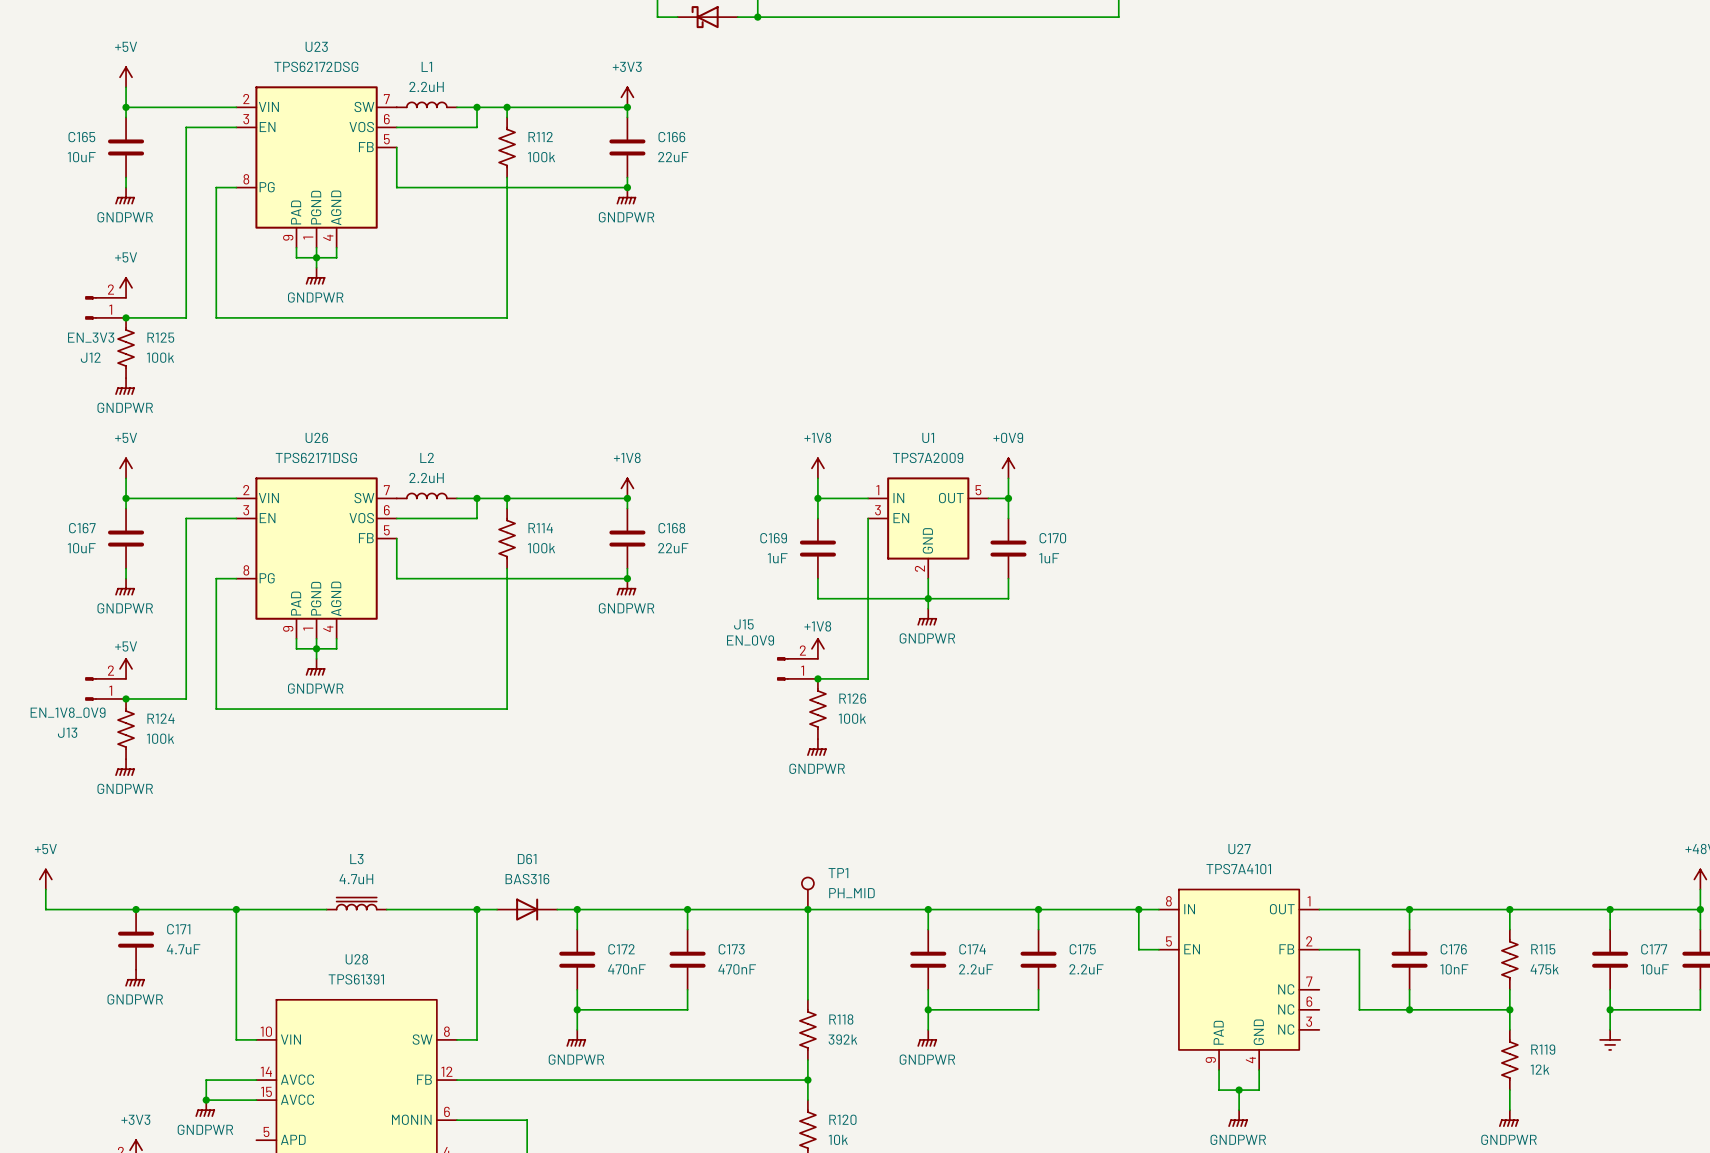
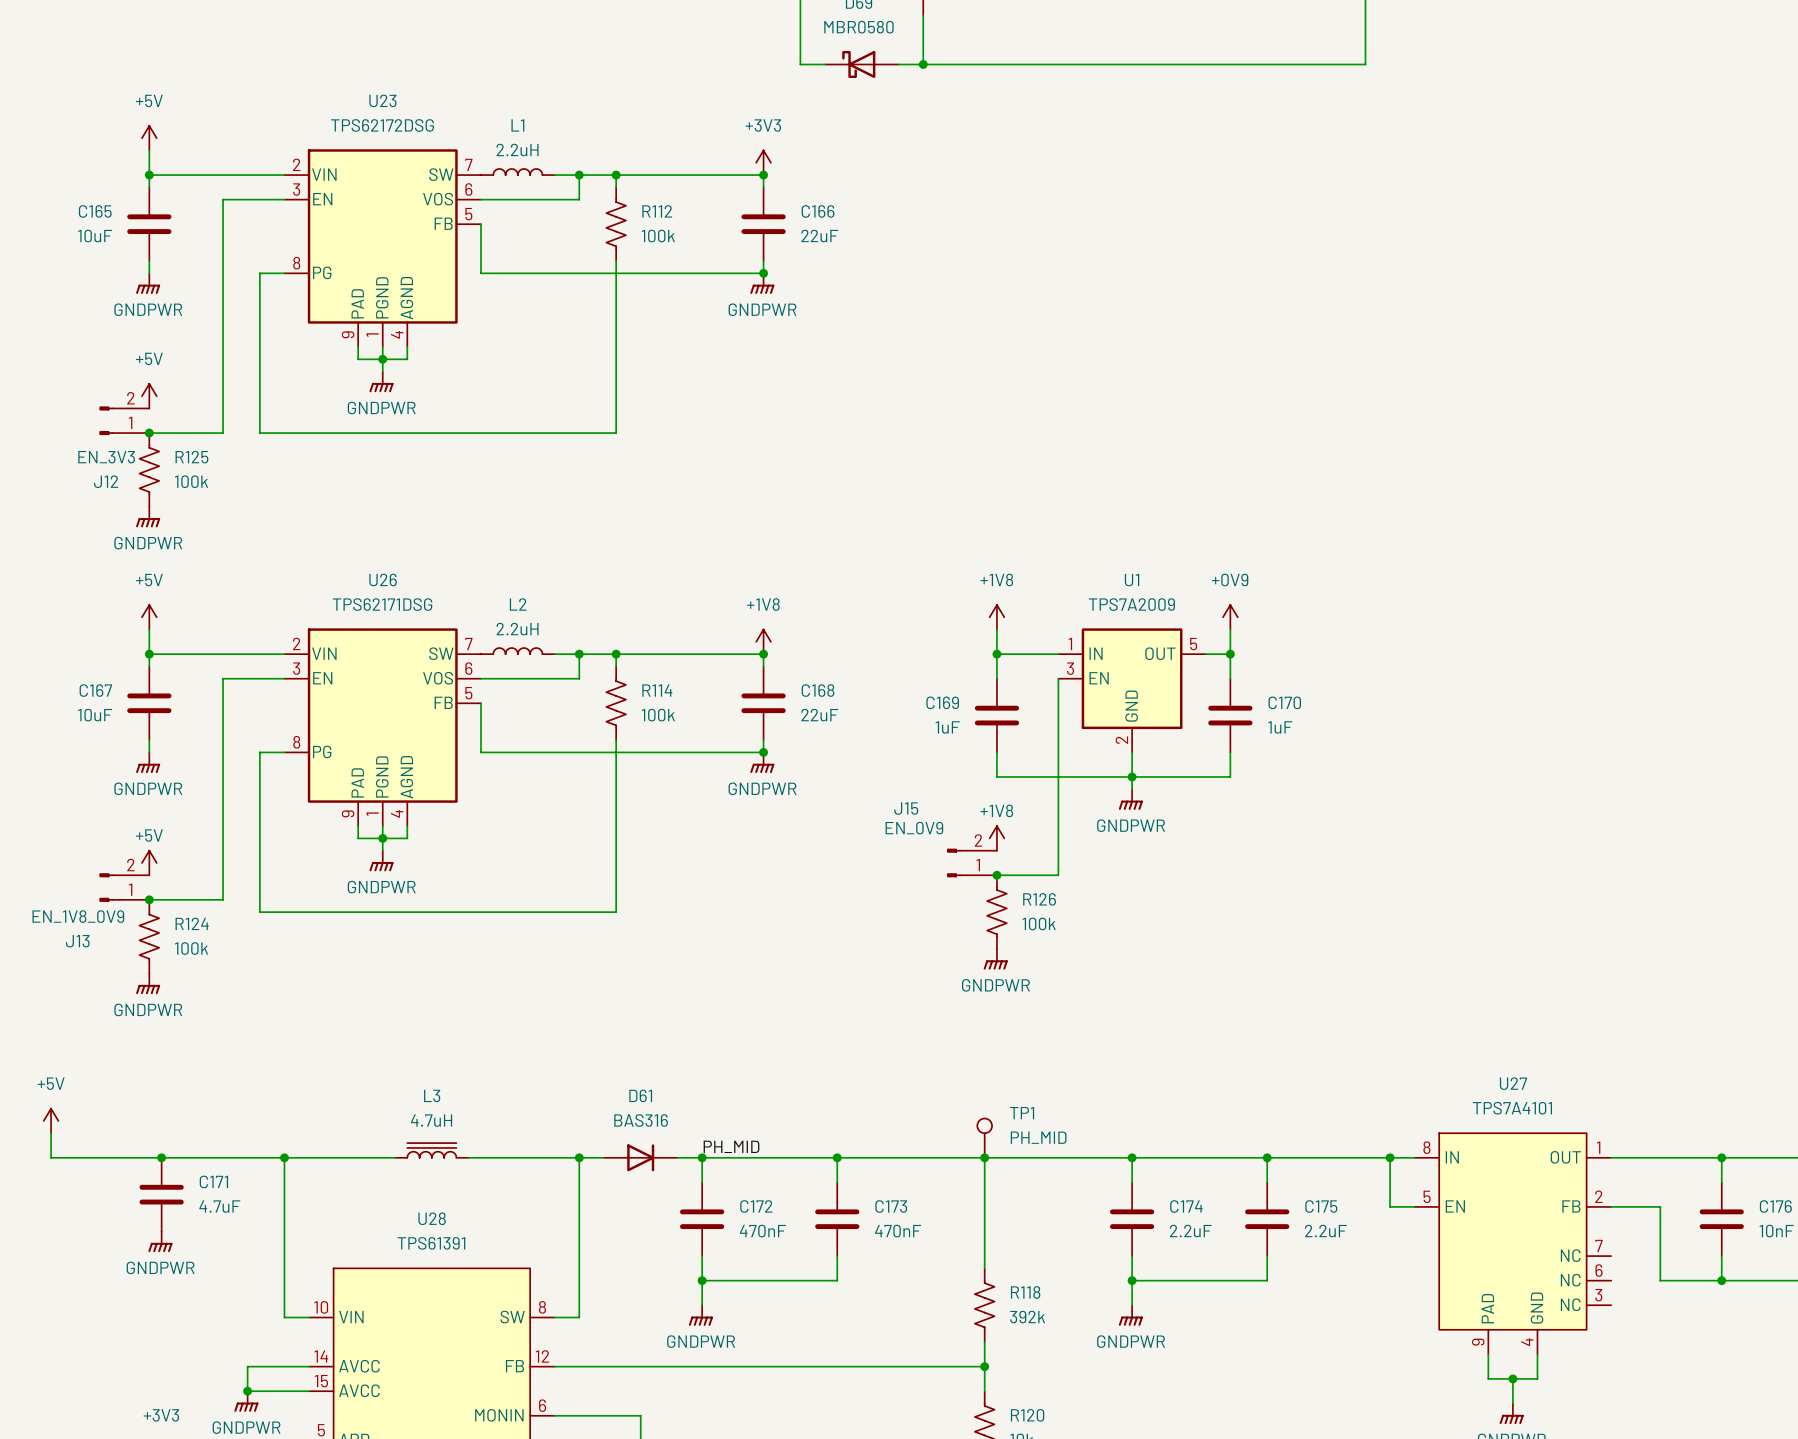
label: none -> PH_MID (731, 1146)

